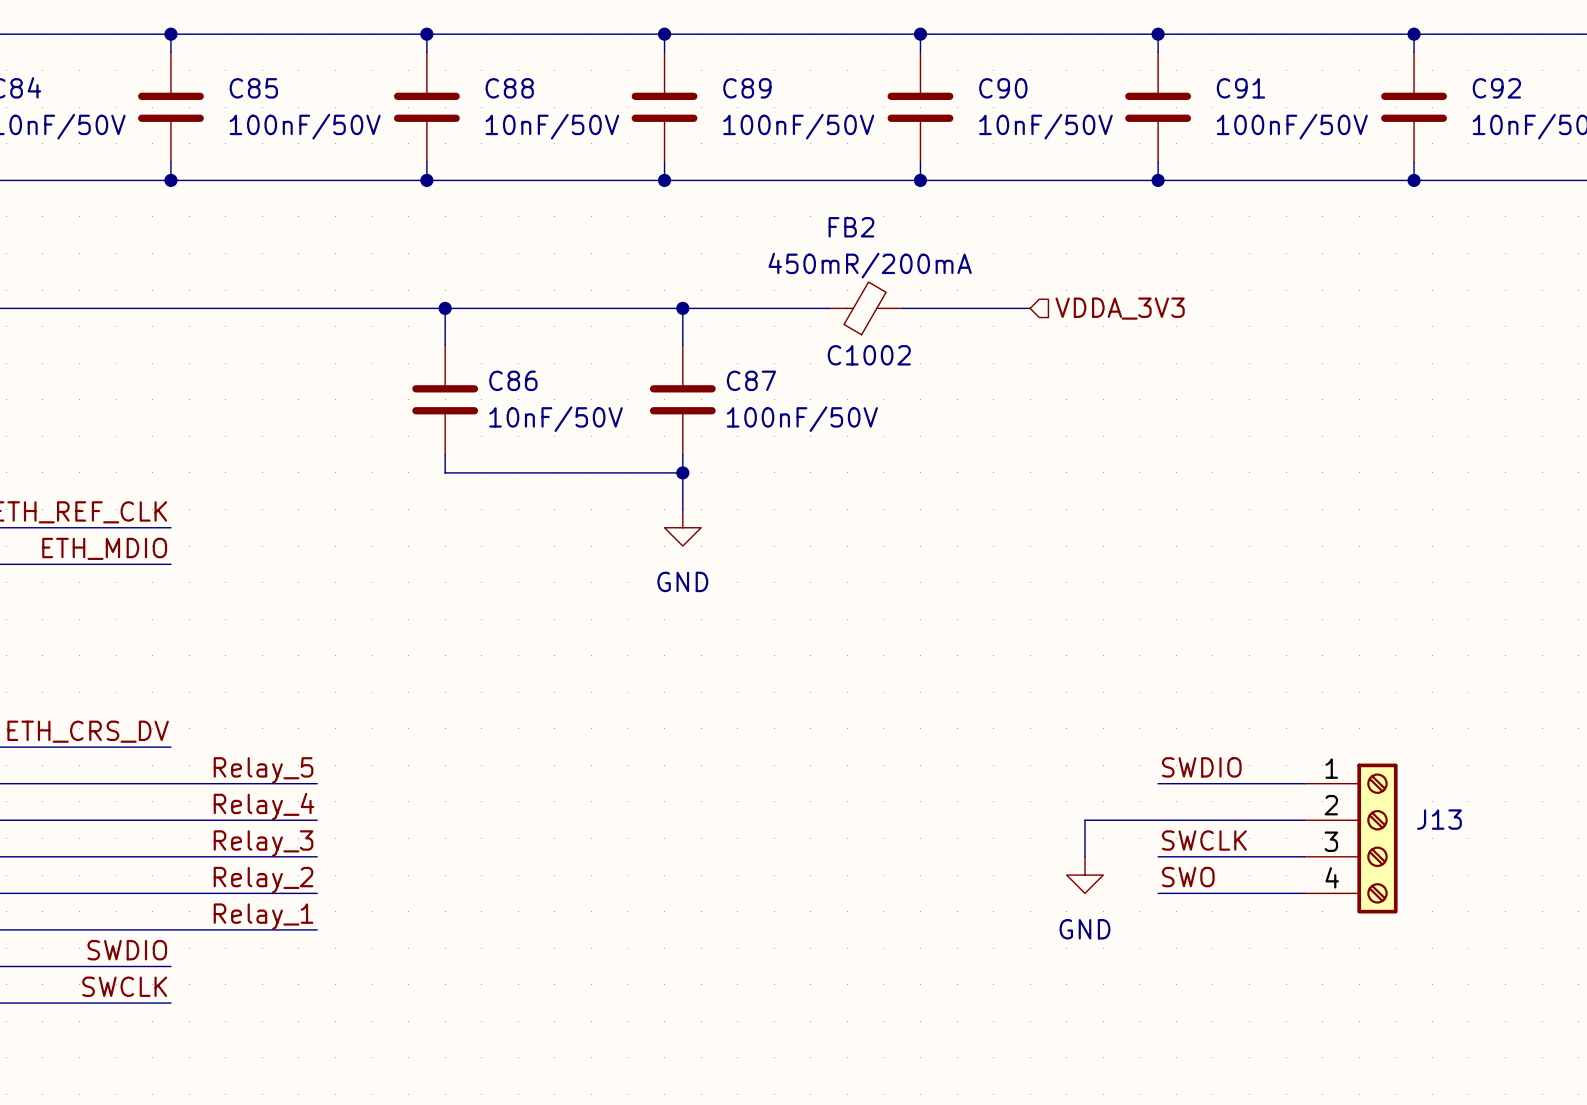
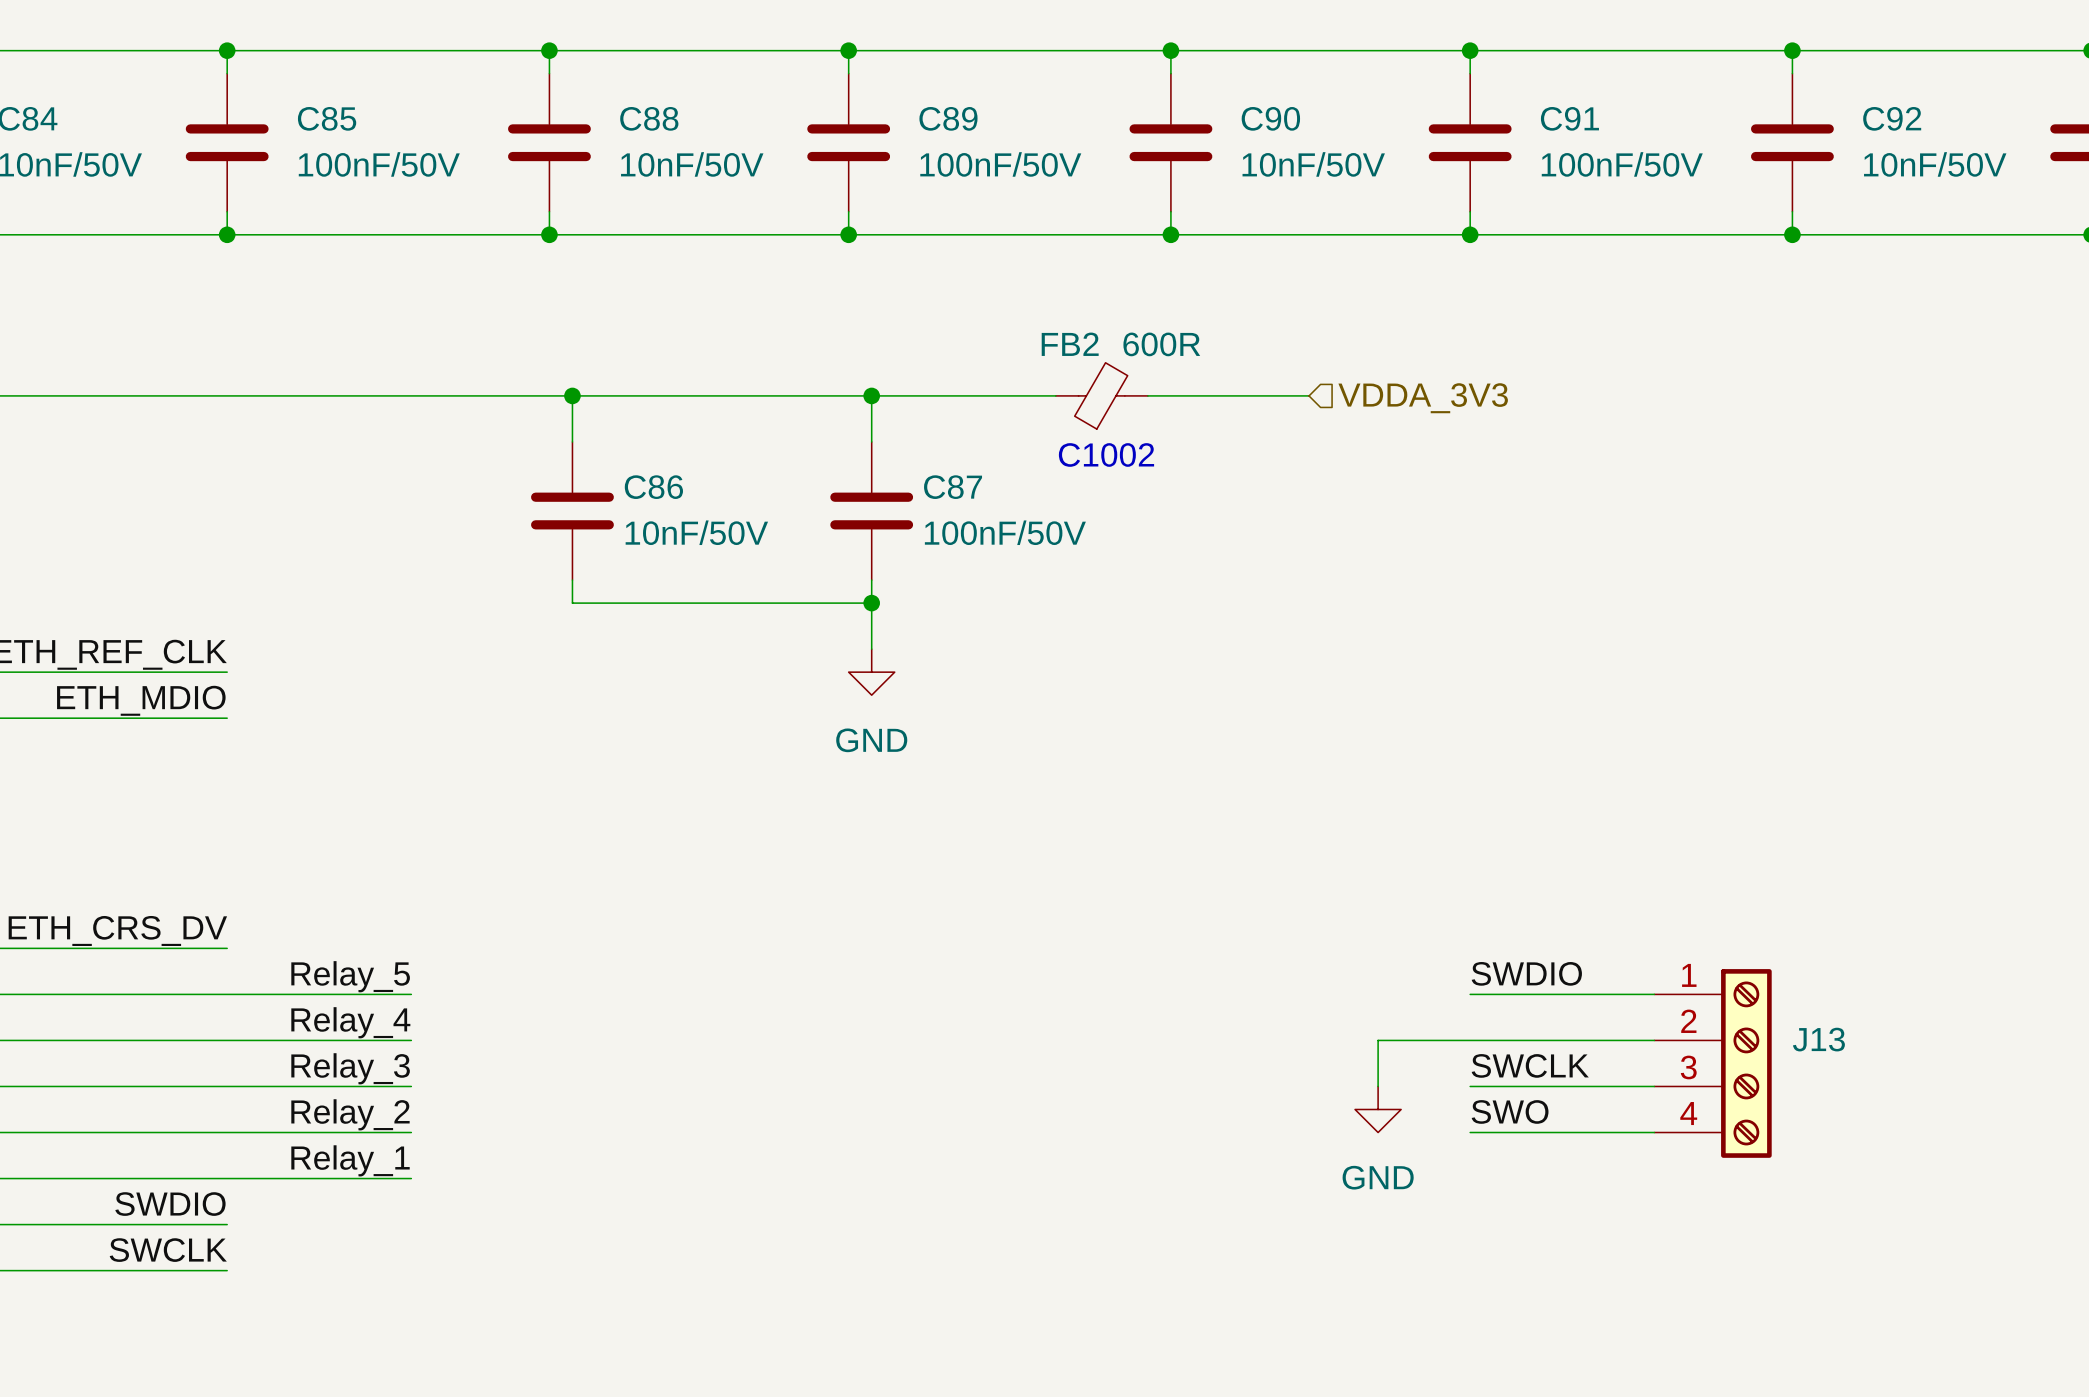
FB2 name position: FB2 (851, 227) -> FB2 (1070, 344)
FB2 value: 450mR/200mA (870, 265) -> 600R (1161, 344)

